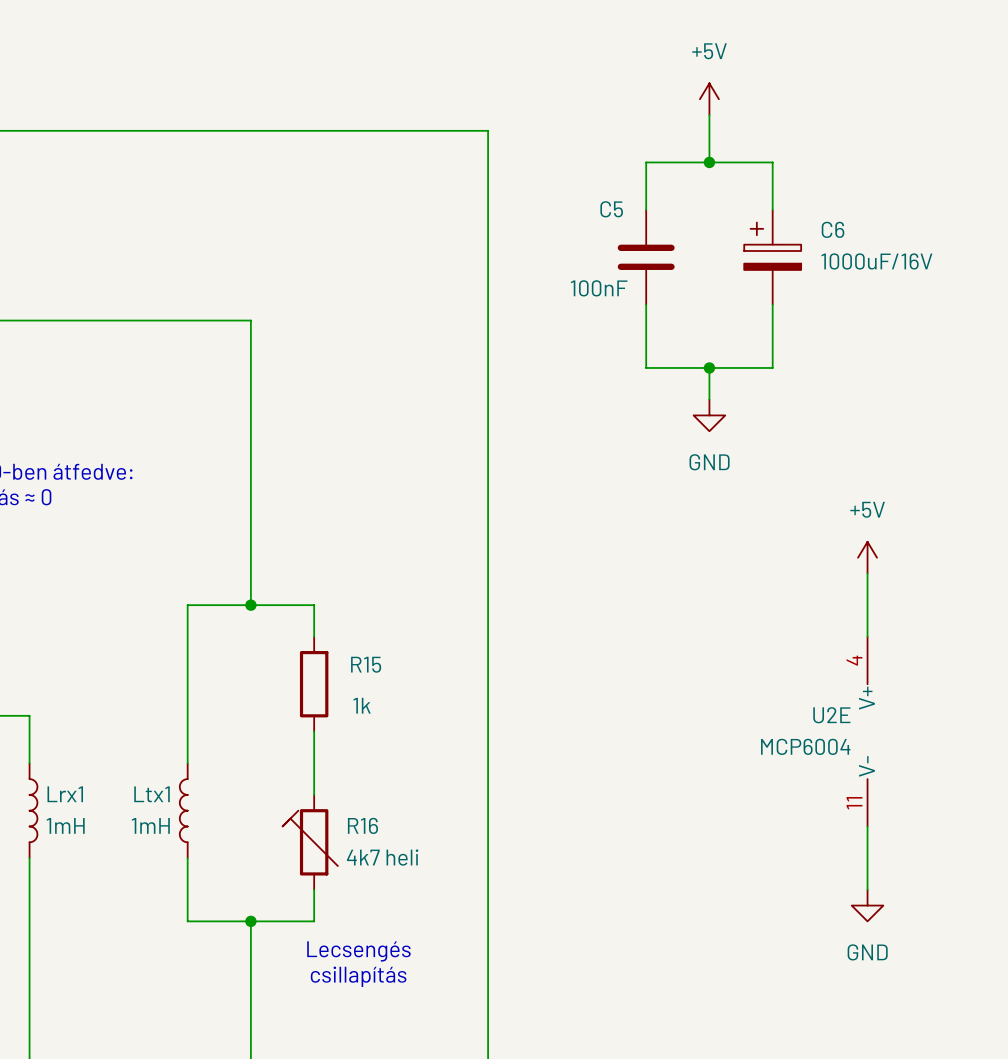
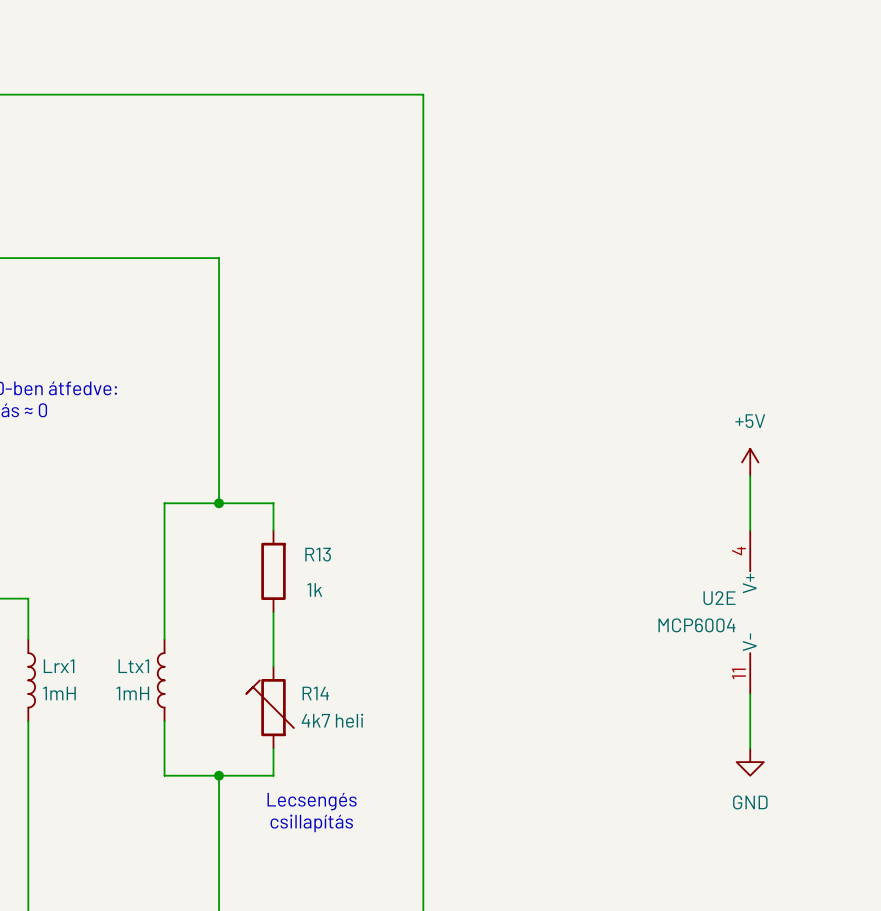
power symbol: +5V (709, 99) -> none
wire: (709, 115) (709, 162) -> none
junction: (709, 162) -> none
wire: (646, 209) (646, 162) (772, 162) (772, 209) -> none
C5: 100nF (646, 257) -> none
C6: 1000uF/16V (772, 257) -> none
wire: (646, 304) (646, 367) (772, 367) (772, 304) -> none
wire: (709, 367) (709, 399) -> none
junction: (709, 367) -> none
power symbol: GND (709, 415) -> none
R15 name: R15 (366, 664) -> R13 (318, 554)
R16 name: R16 (362, 825) -> R14 (315, 693)

